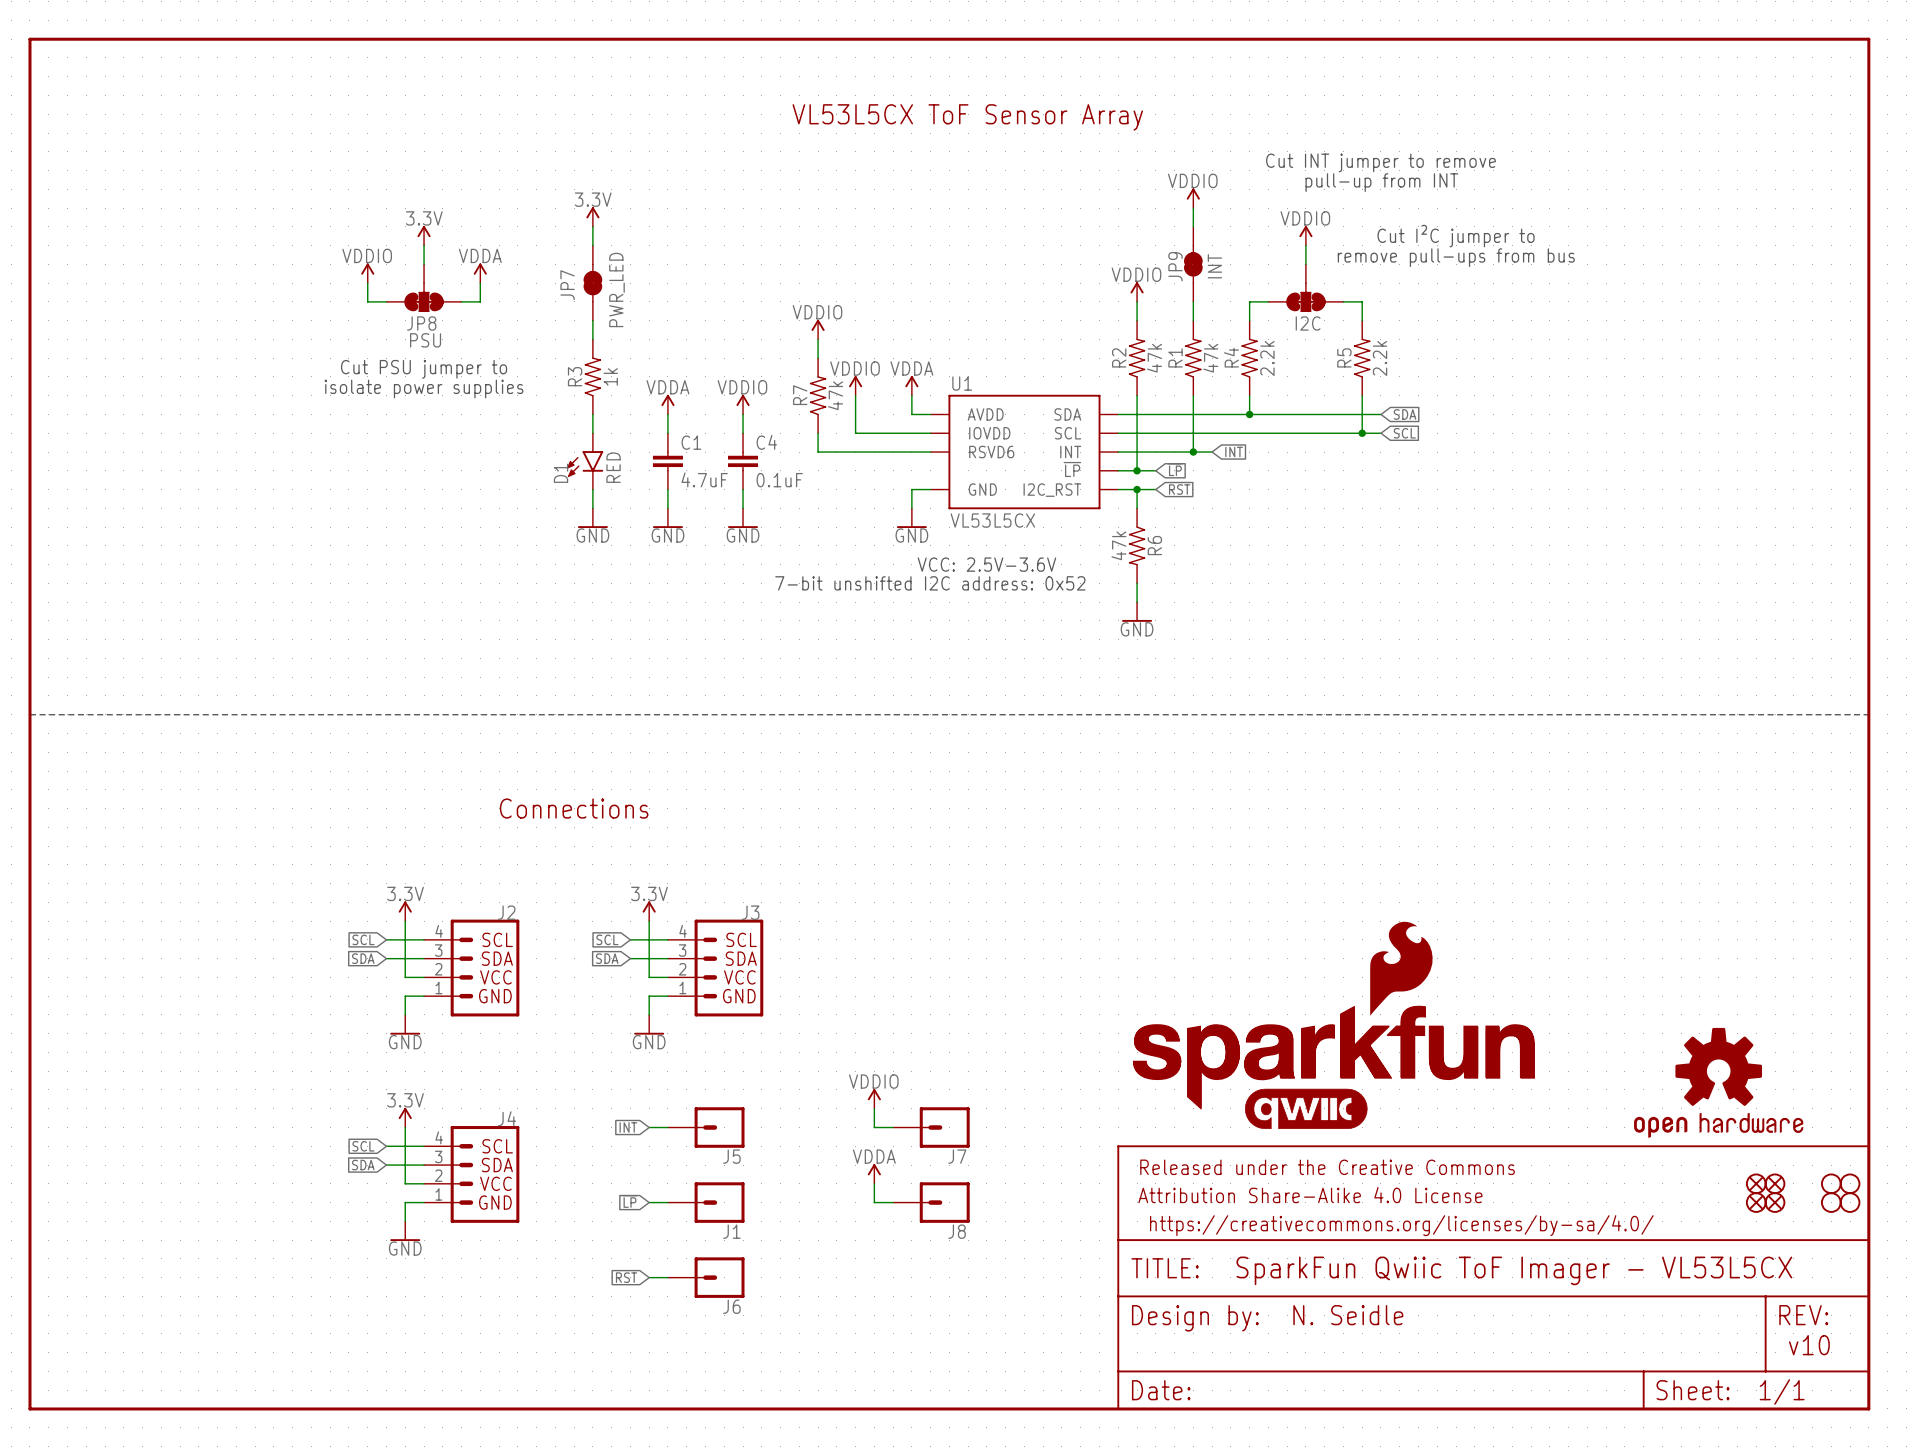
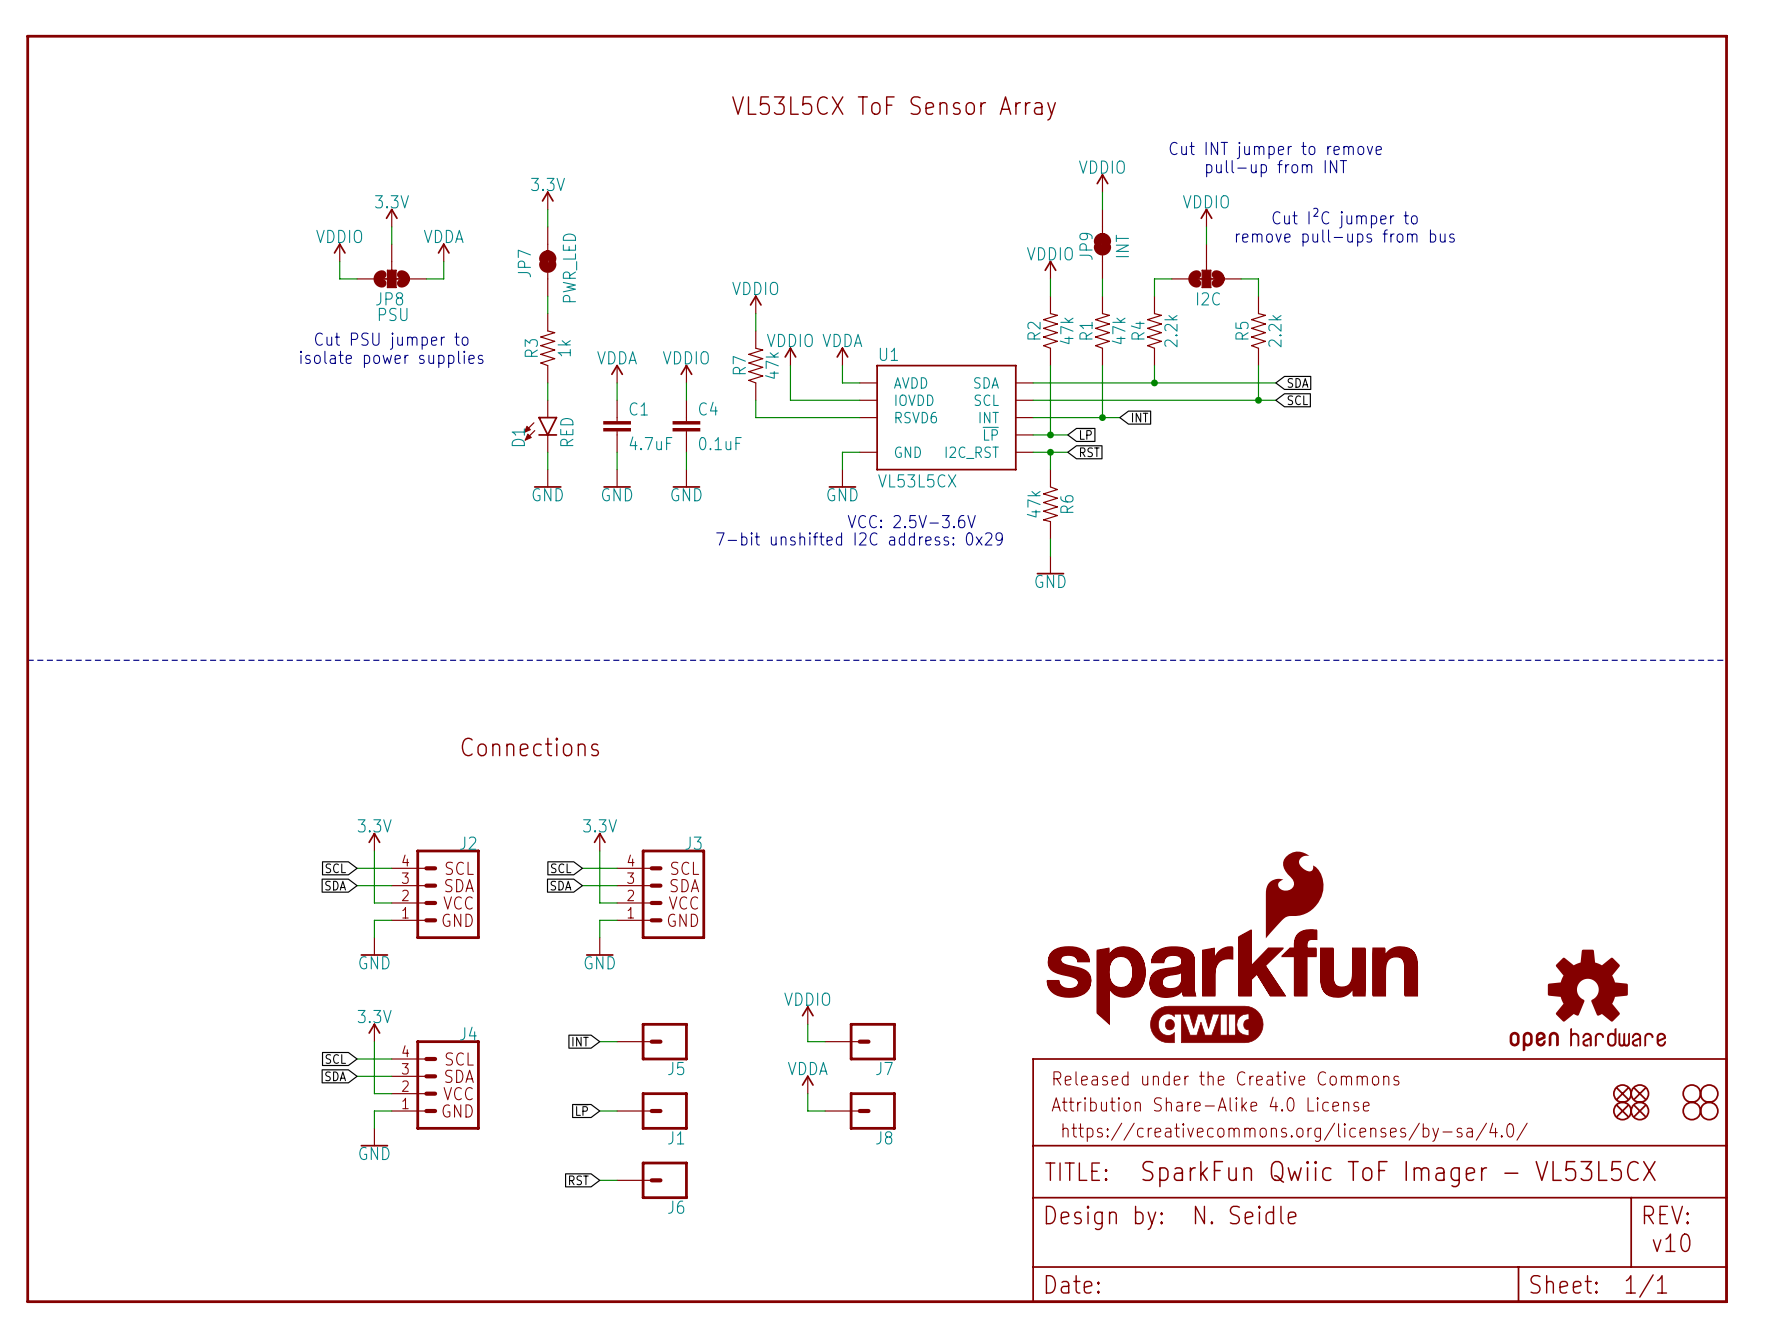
text: 7-bit unshifted I2C address: 0x52 (930, 583) -> 7-bit unshifted I2C address: 0x29 (859, 538)

